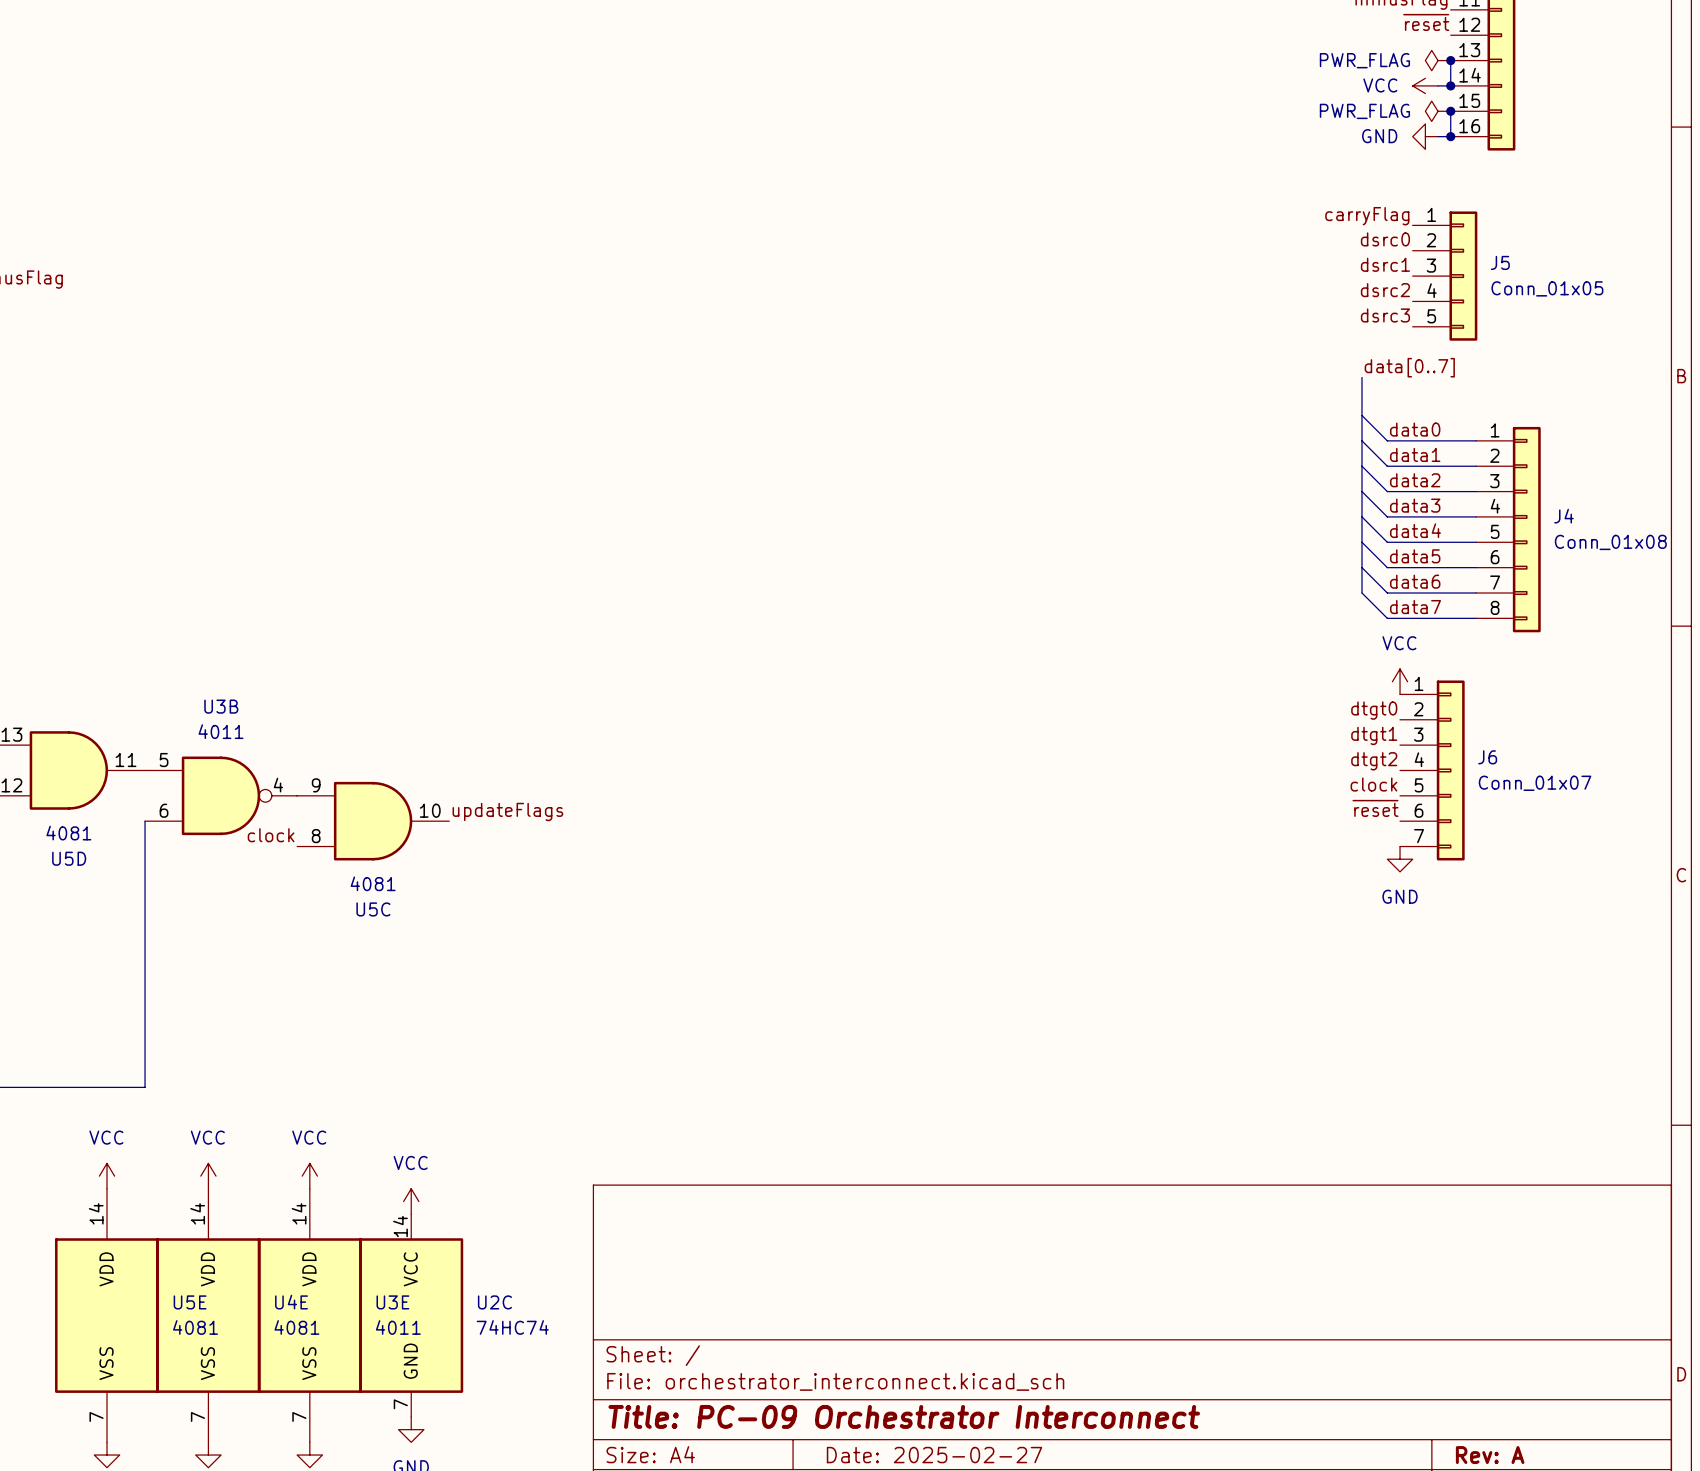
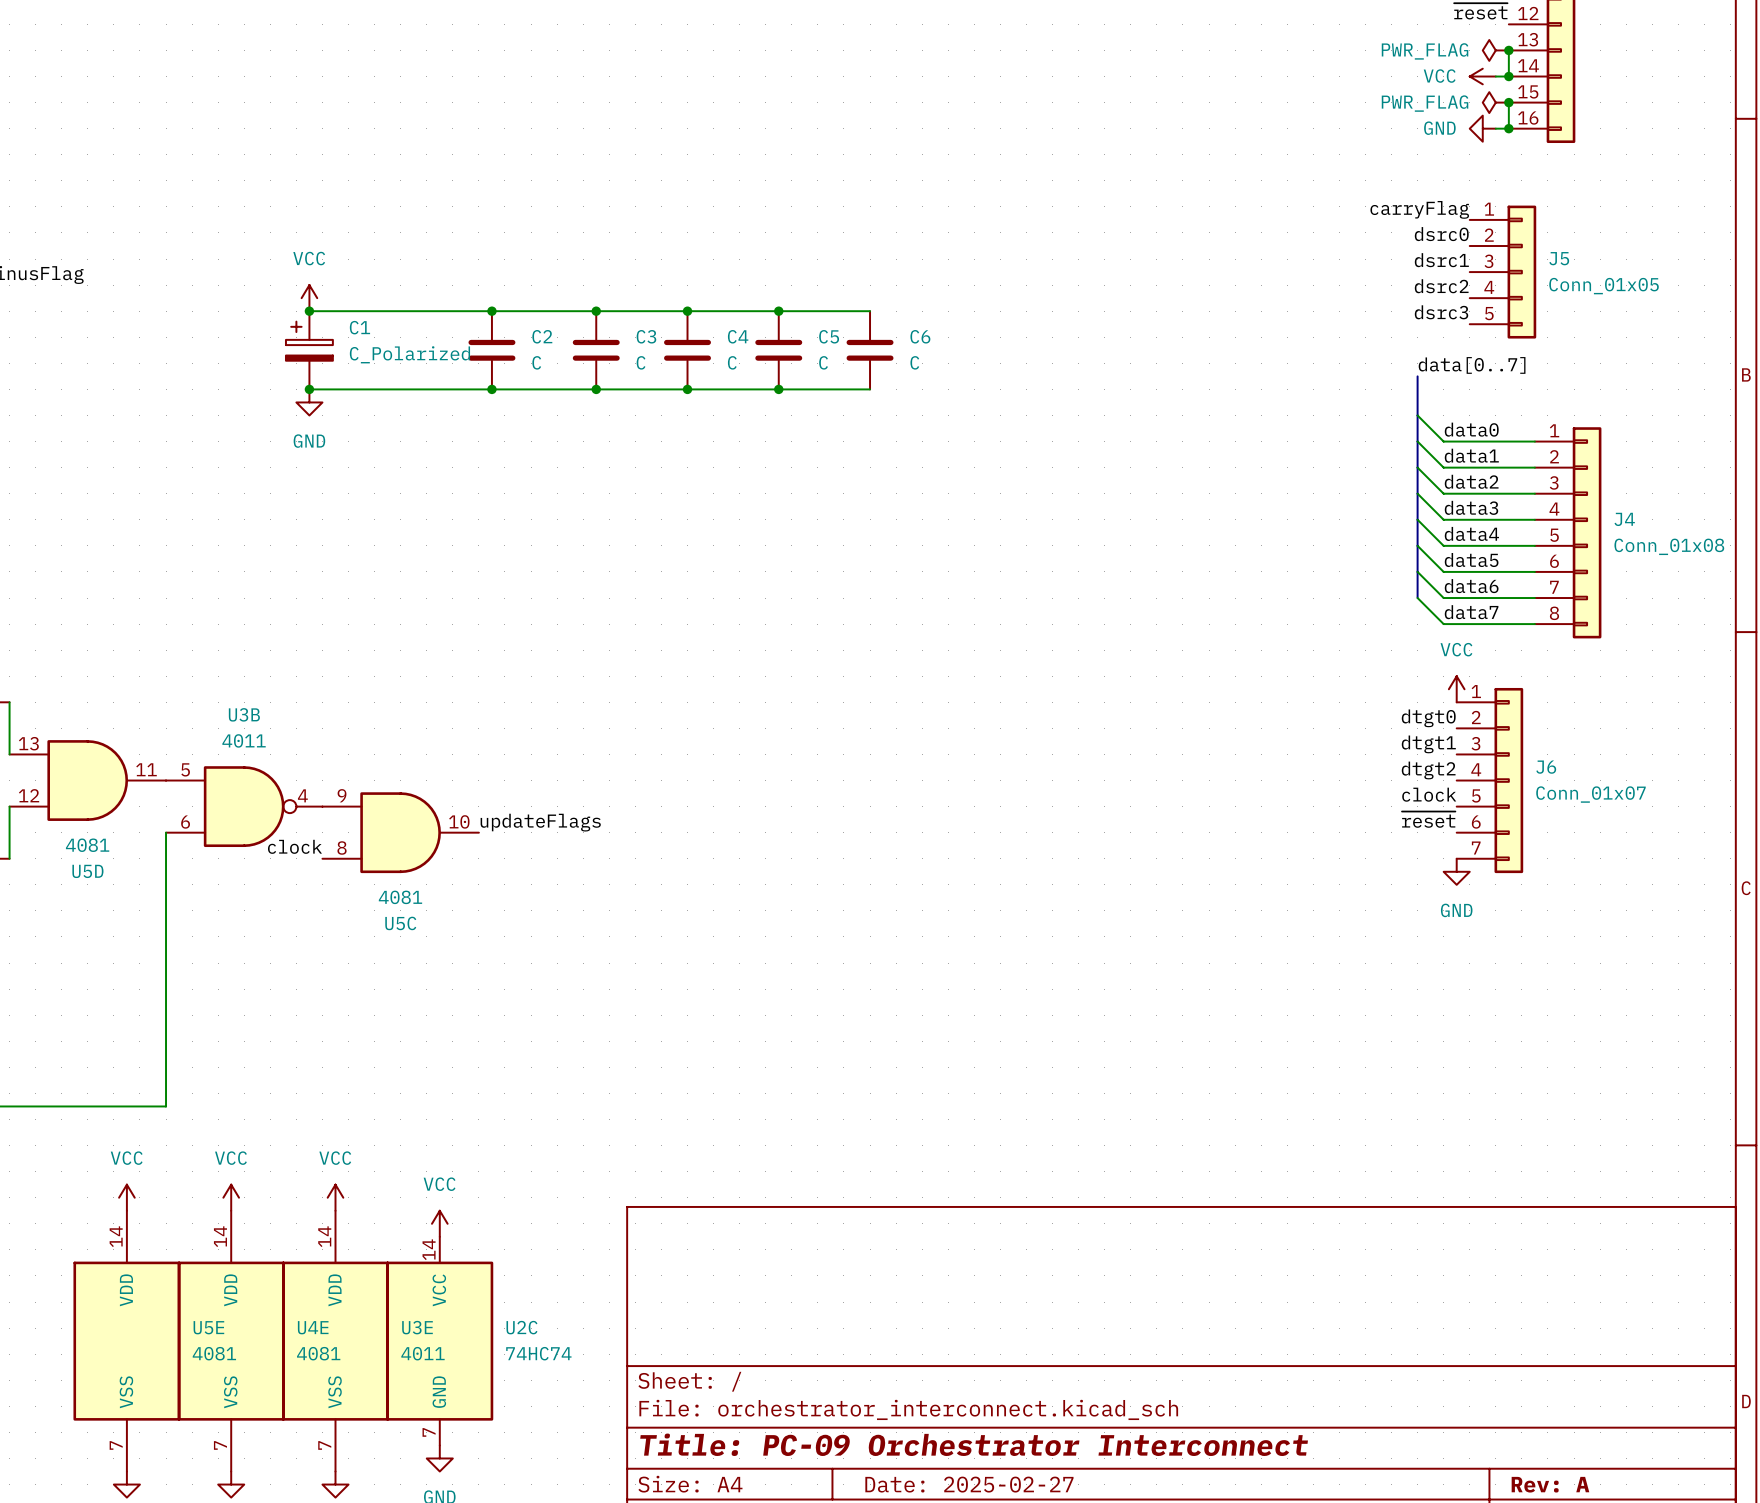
power symbol: none -> VCC (309, 298)
wire: none -> (309, 311) (870, 311)
junction: none -> (309, 311)
junction: none -> (491, 311)
junction: none -> (596, 311)
junction: none -> (687, 311)
junction: none -> (778, 311)
C1: none -> C_Polarized (309, 350)
C2: none -> C (491, 350)
C3: none -> C (596, 350)
C4: none -> C (687, 350)
C5: none -> C (778, 350)
C6: none -> C (870, 350)
wire: none -> (309, 389) (870, 389)
junction: none -> (309, 389)
junction: none -> (491, 389)
junction: none -> (596, 389)
junction: none -> (687, 389)
junction: none -> (778, 389)
power symbol: none -> GND (309, 402)

